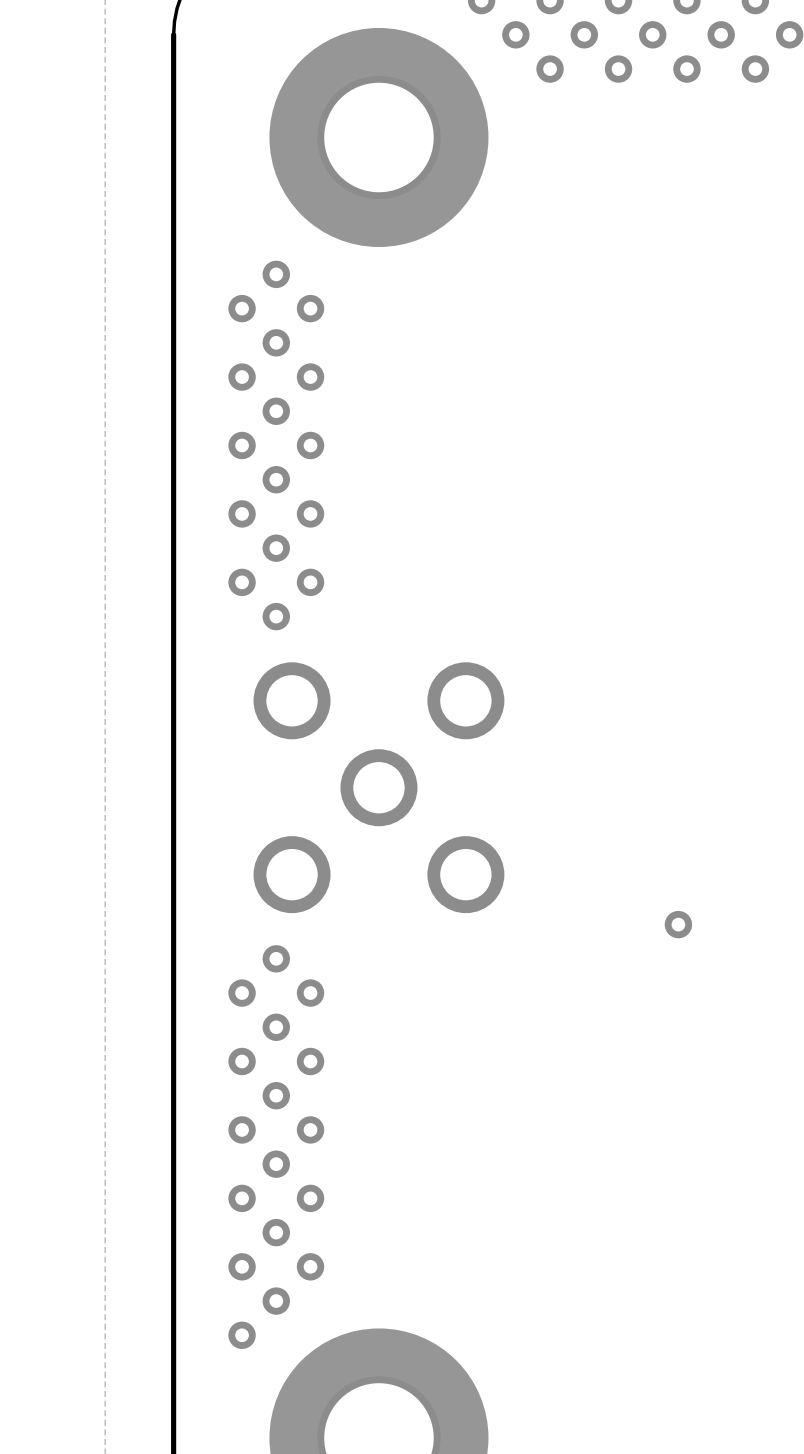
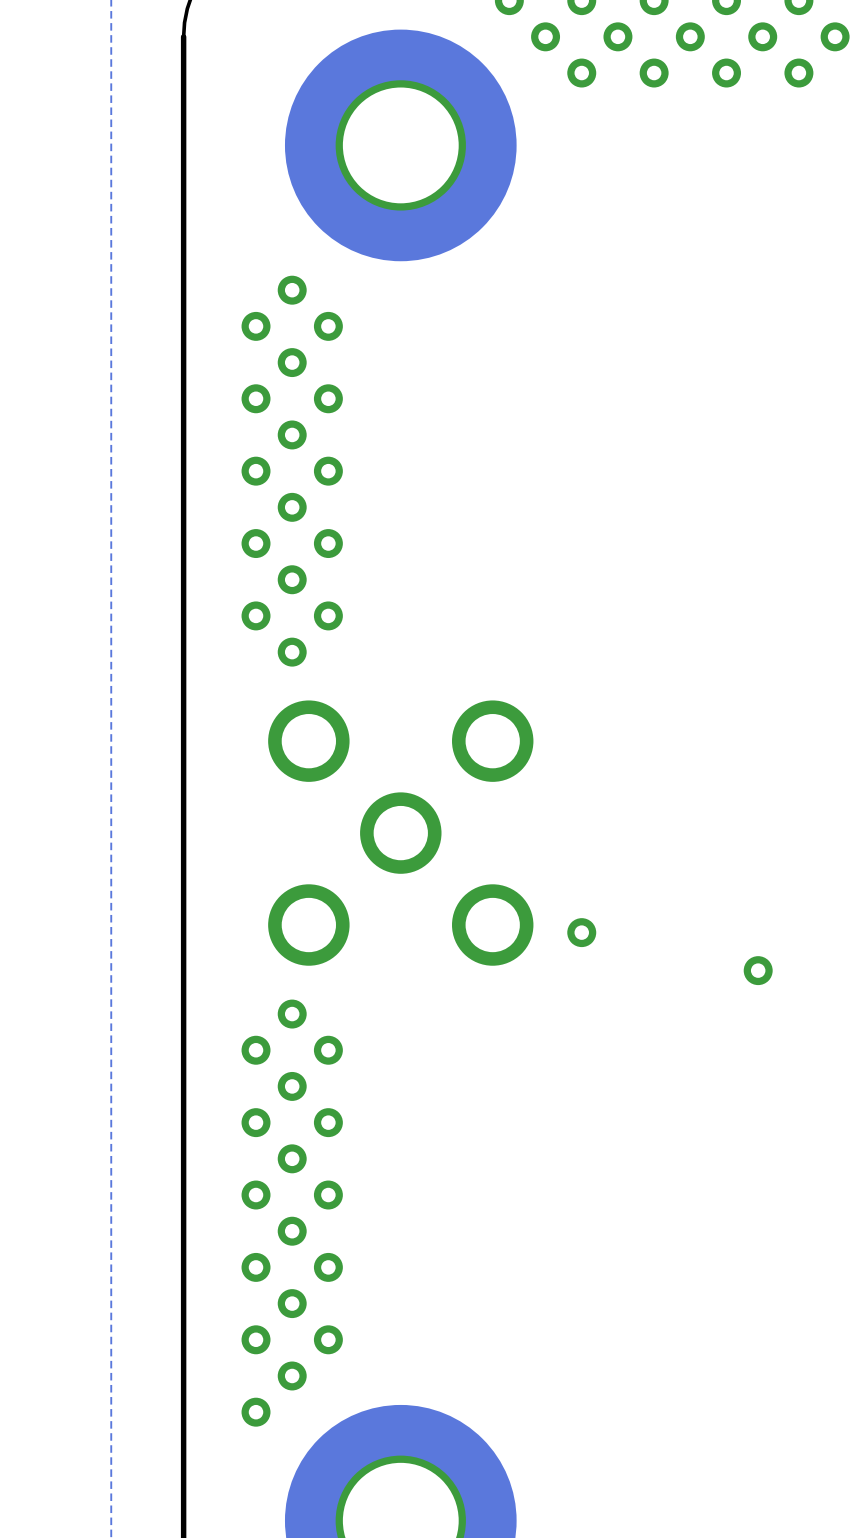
via: none -> (581, 932)
via position: (678, 924) -> (758, 970)

